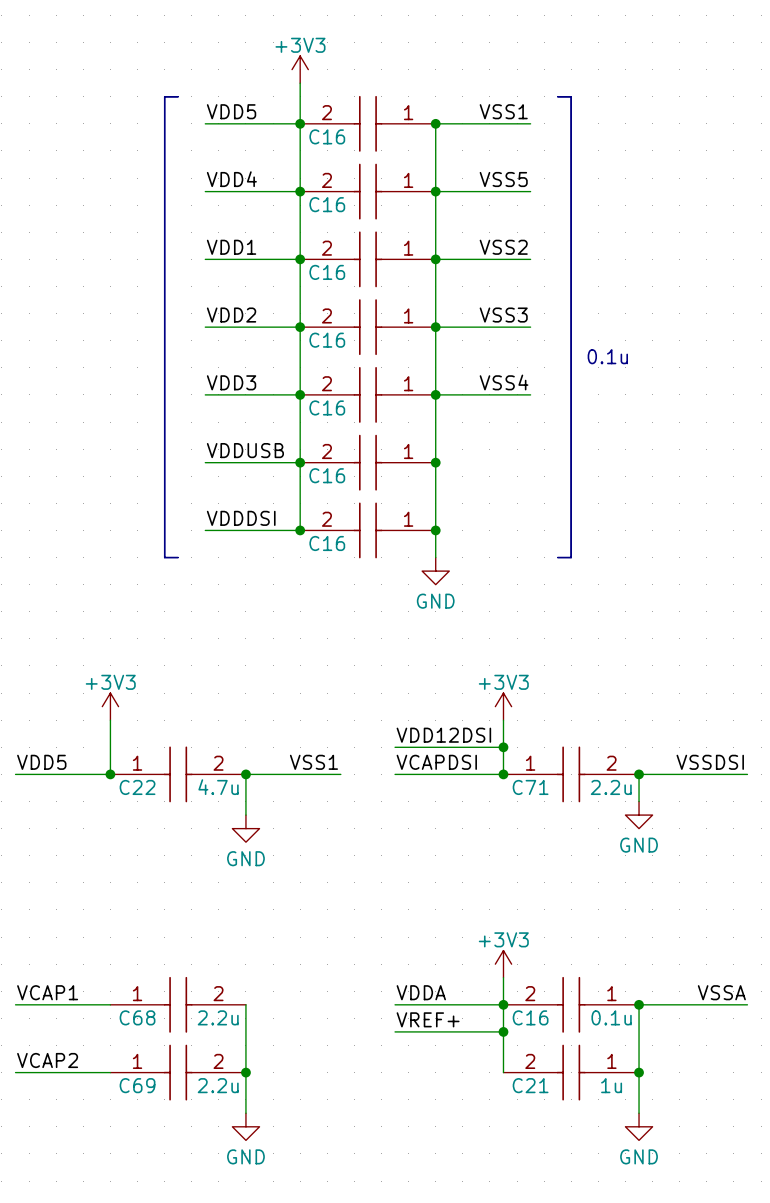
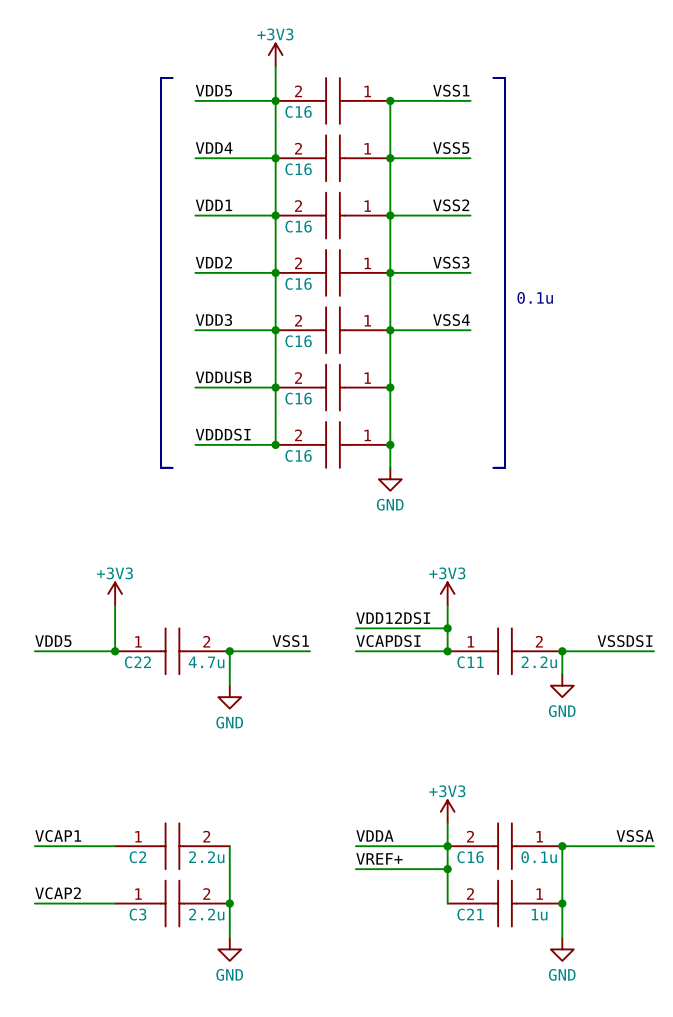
C71 name: C71 (530, 787) -> C11 (470, 662)
C68 name: C68 (137, 1017) -> C2 (137, 857)
C69 name: C69 (137, 1085) -> C3 (138, 914)

